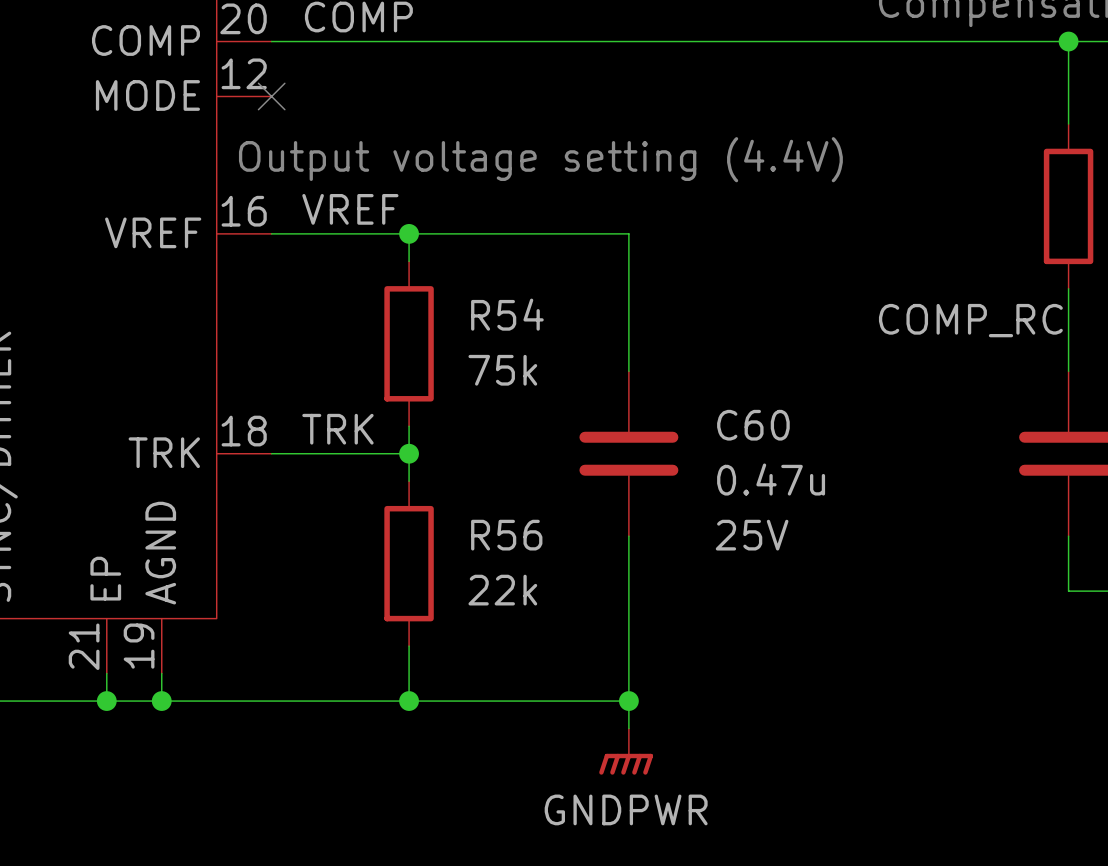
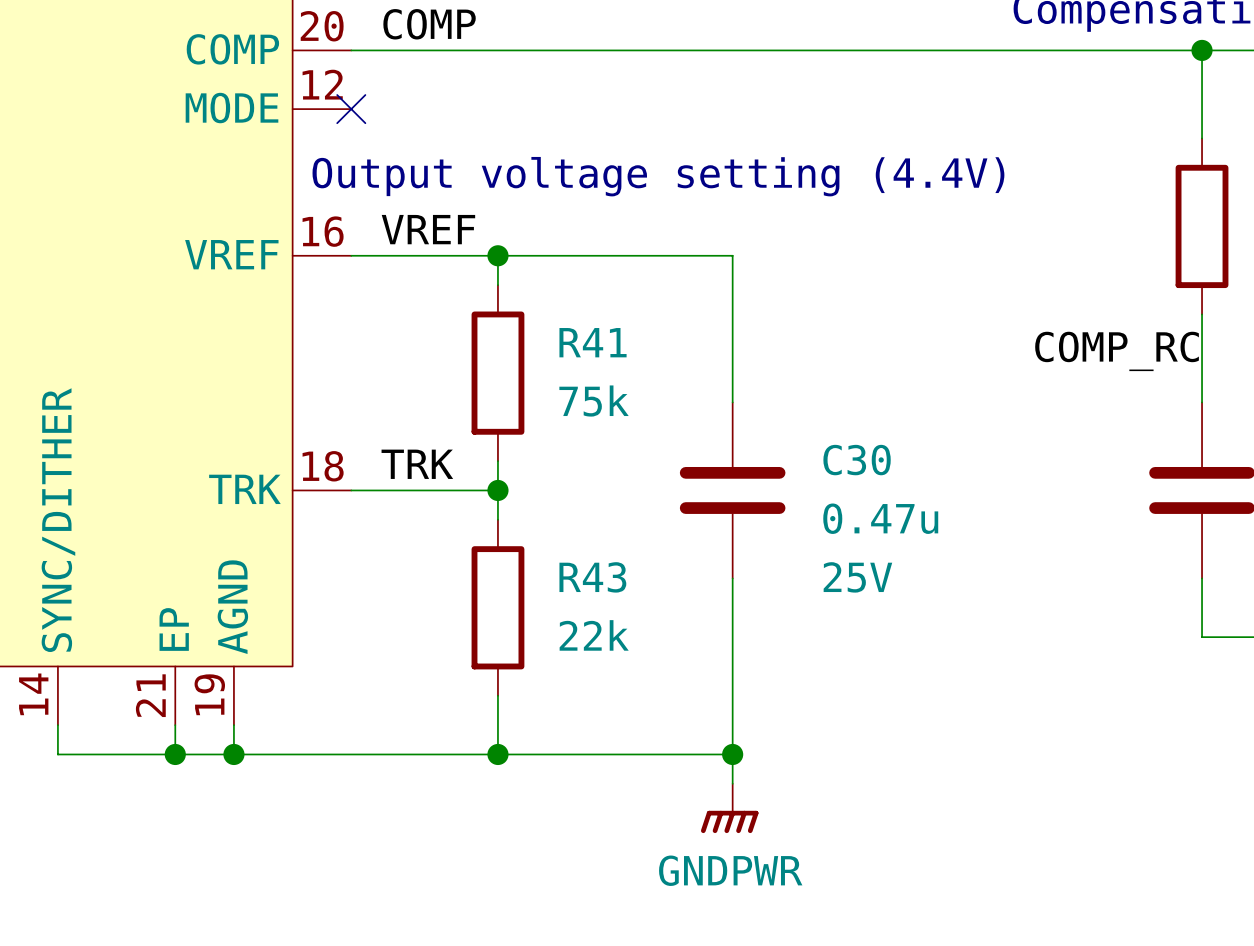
R54 name: R54 (507, 314) -> R41 (593, 342)
C60 name: C60 (753, 425) -> C30 (857, 460)
R56 name: R56 (506, 535) -> R43 (592, 577)

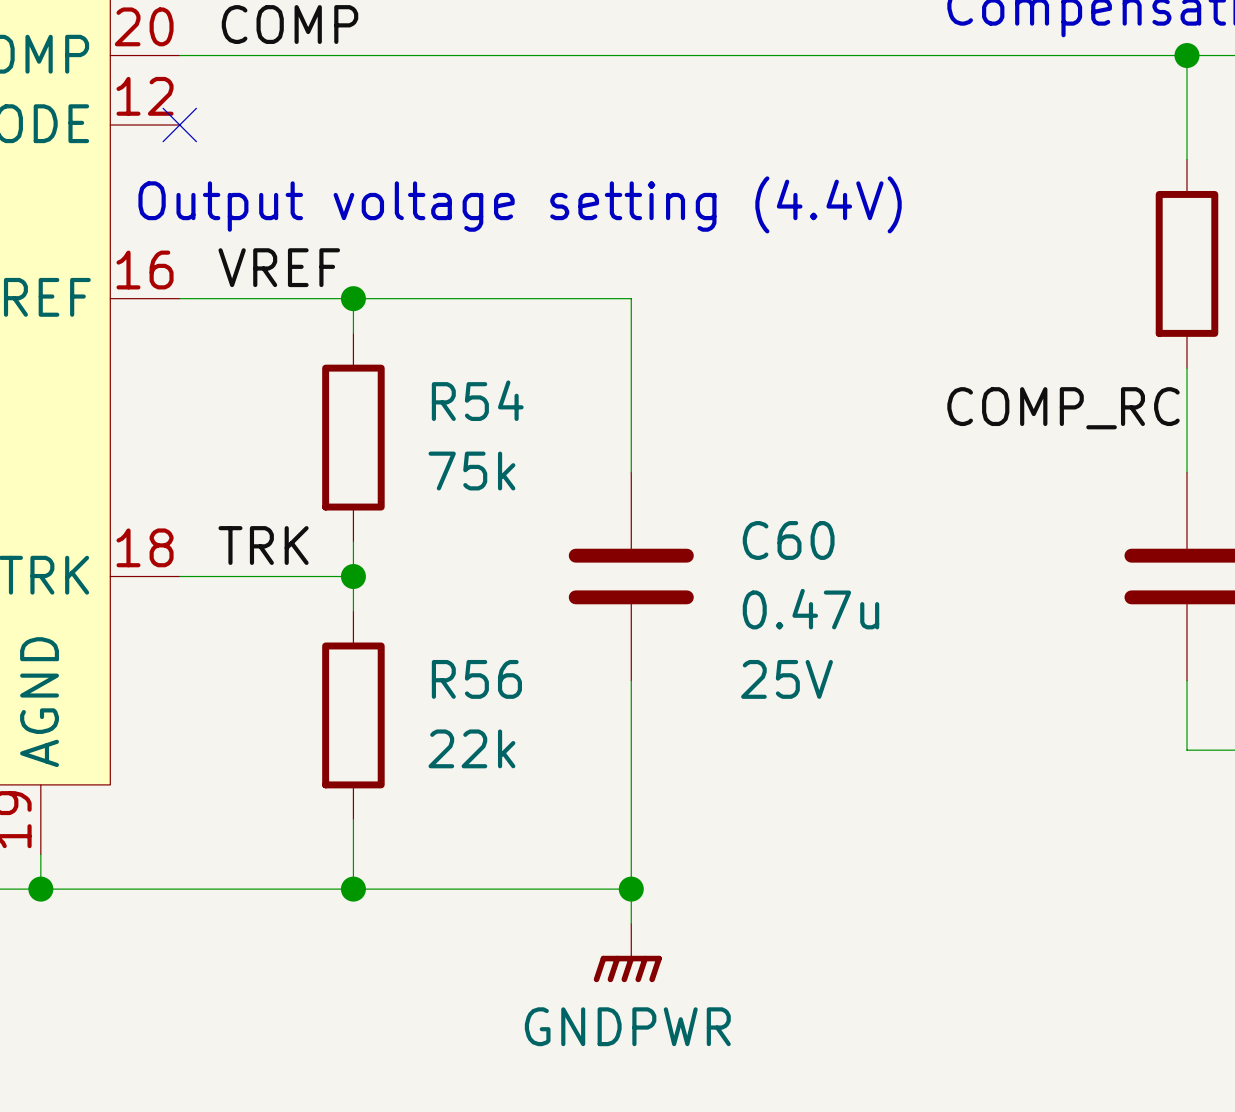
R41 name: R41 (593, 342) -> R54 (477, 400)
C30 name: C30 (857, 460) -> C60 (788, 540)
R43 name: R43 (592, 577) -> R56 (476, 679)

